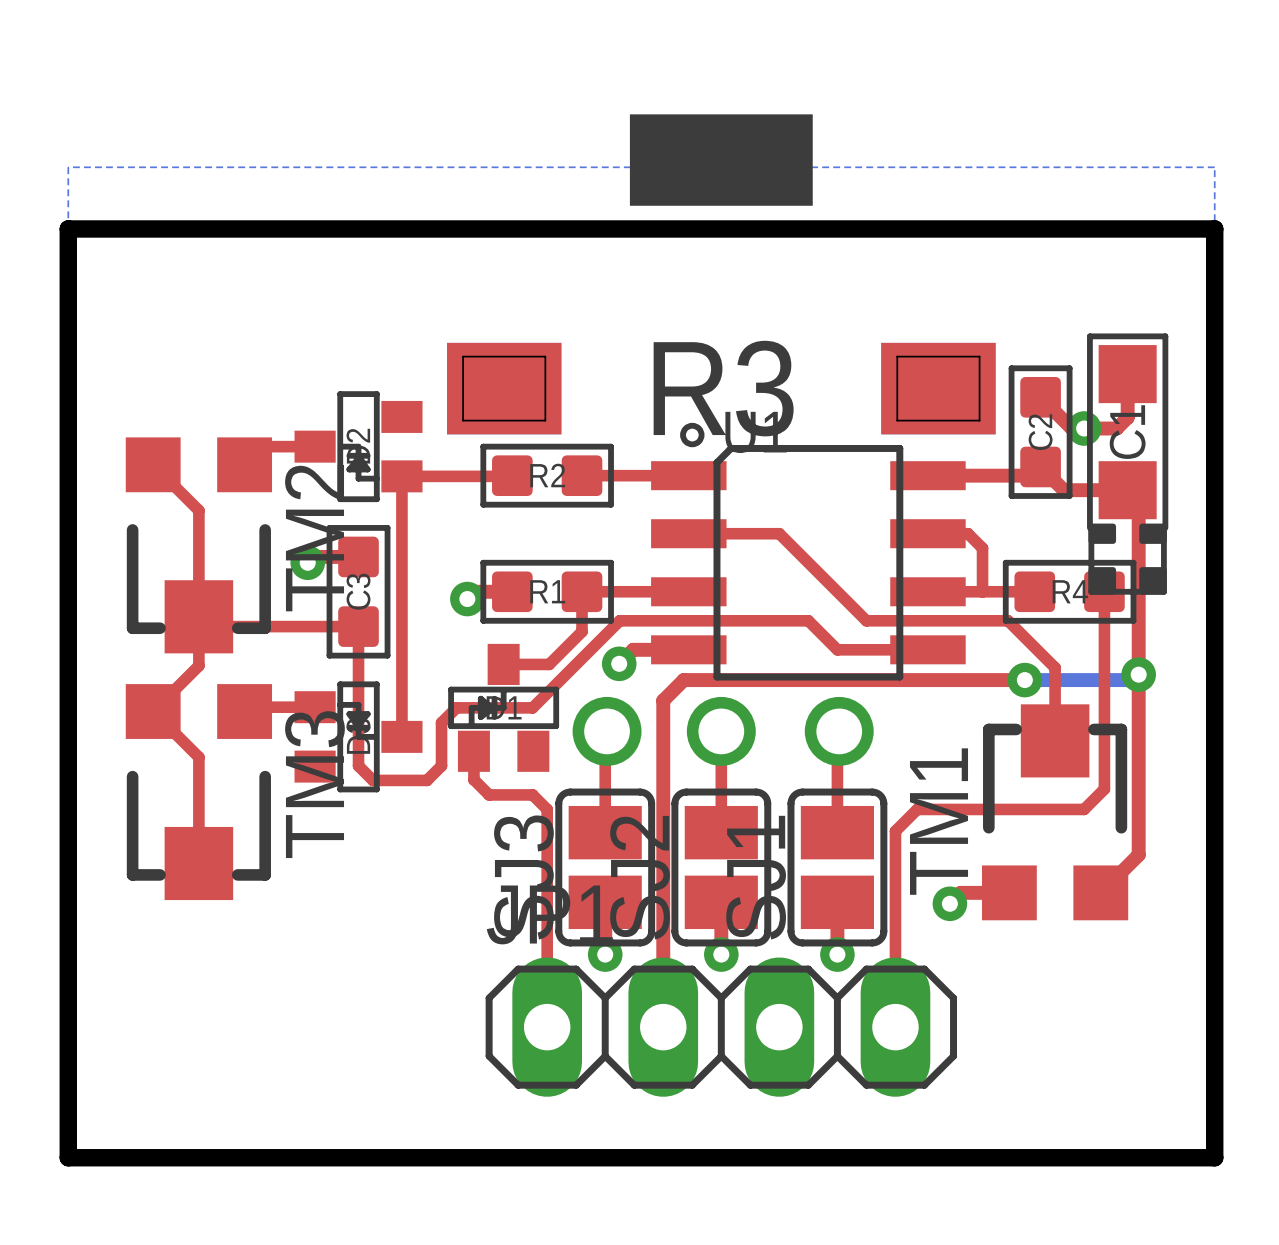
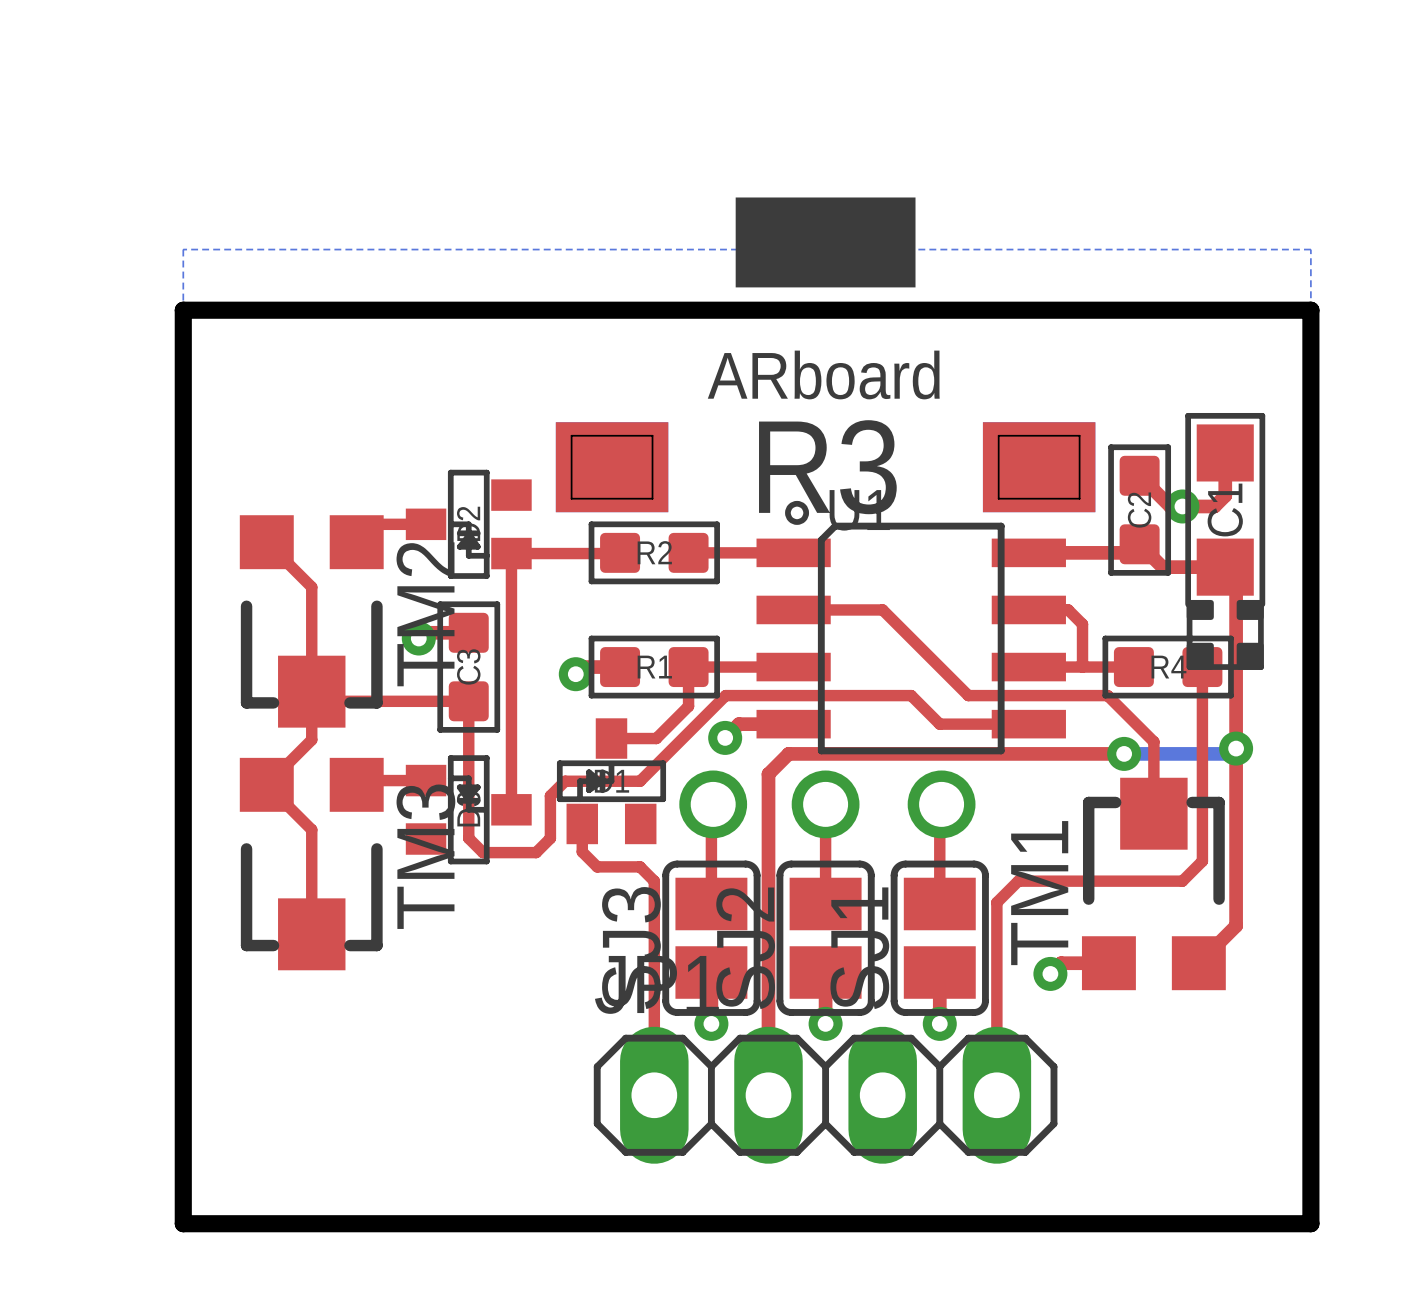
R3 text: none -> ARboard (823, 374)

